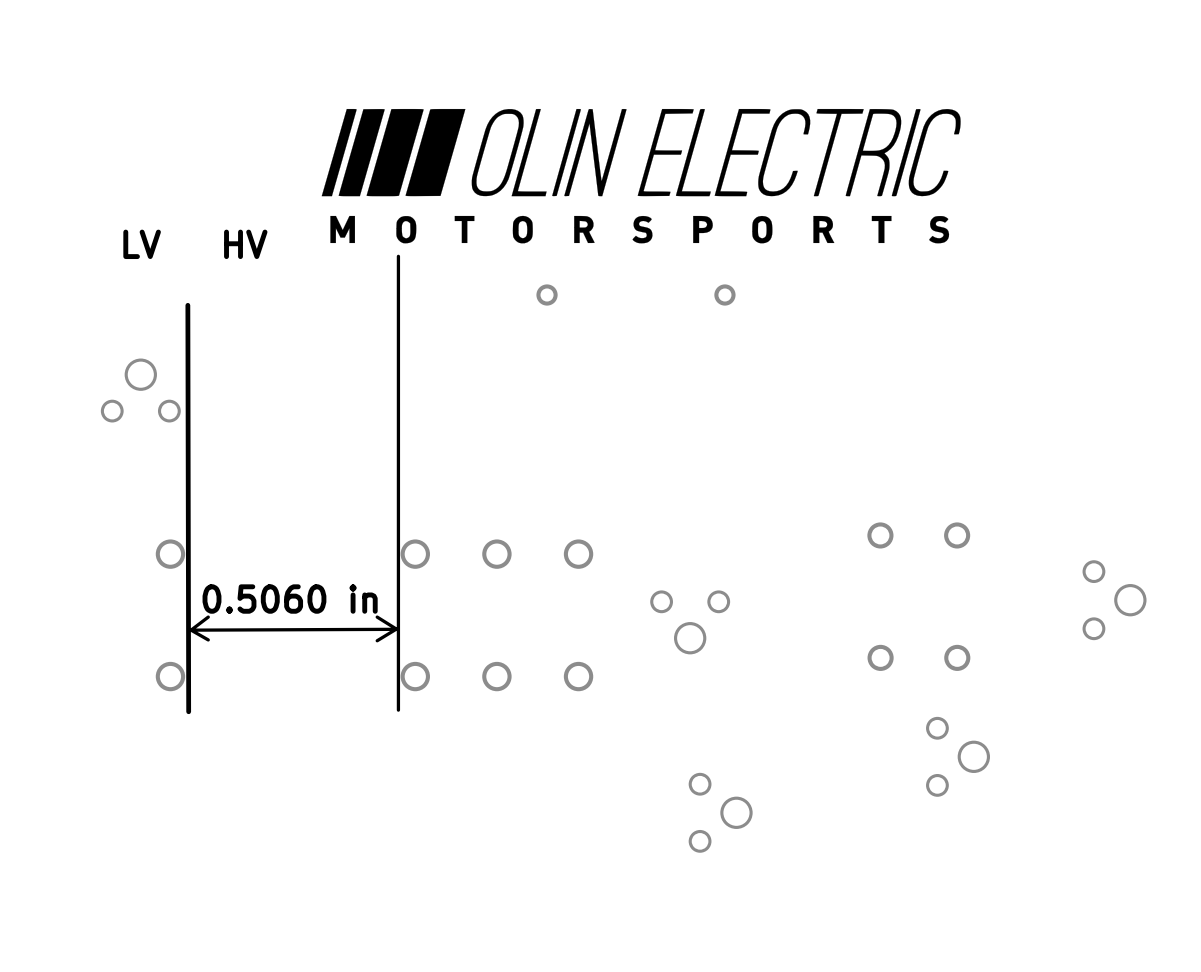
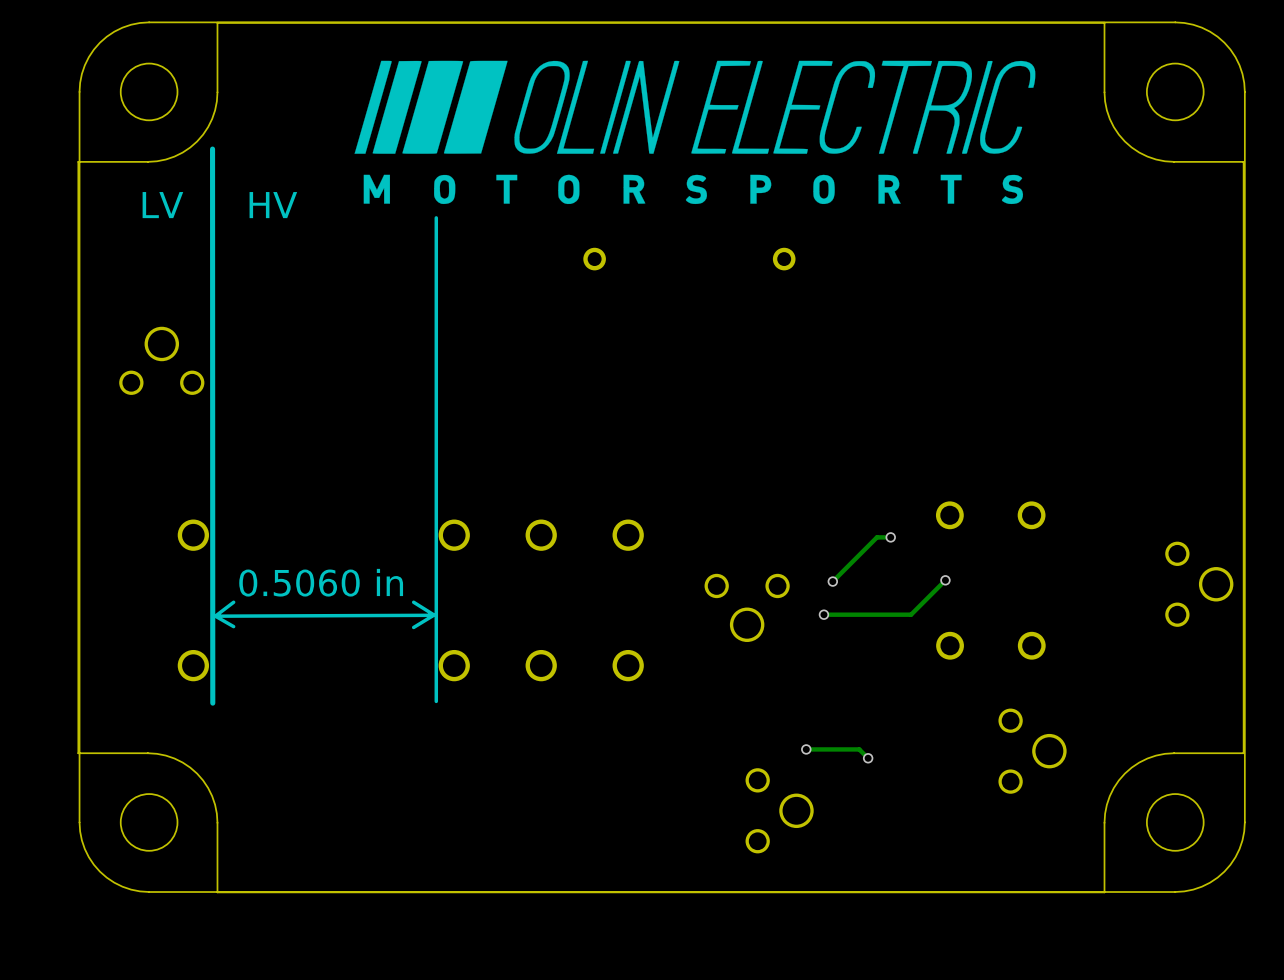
board edge: none -> (1175, 22) (149, 22) (131, 24) (106, 36) (88, 57) (81, 73) (79, 91) (79, 822) (84, 849) (93, 864) (106, 877) (122, 886) (149, 892) (1175, 892) (1193, 889) (1217, 877) (1230, 864) (1239, 849) (1244, 822) (1244, 91) (1239, 65) (1224, 42) (1201, 27) (1175, 22)
board edge: none -> (1104, 22) (1105, 101) (1109, 118) (1124, 141) (1147, 156) (1164, 161) (1243, 161) (1243, 753) (1164, 753) (1147, 758) (1124, 773) (1109, 796) (1105, 813) (1104, 892) (217, 892) (216, 813) (208, 788) (197, 773) (174, 758) (156, 753) (78, 753) (78, 161) (156, 161) (174, 156) (197, 141) (208, 127) (216, 101) (217, 22) (1104, 22)
round board edge: none -> [119, 62, 179, 122]
round board edge: none -> [1146, 62, 1205, 122]
line: (187, 305) (188, 711) -> (212, 149) (212, 703)
track: none -> (890, 537) (876, 537) (832, 581)
via: none -> (890, 537)
track: none -> (945, 580) (911, 614) (823, 614)
via: none -> (945, 580)
via: none -> (832, 581)
via: none -> (823, 614)
track: none -> (806, 749) (859, 749) (868, 758)
via: none -> (806, 749)
via: none -> (868, 758)
round board edge: none -> [119, 793, 179, 852]
round board edge: none -> [1146, 793, 1205, 852]

